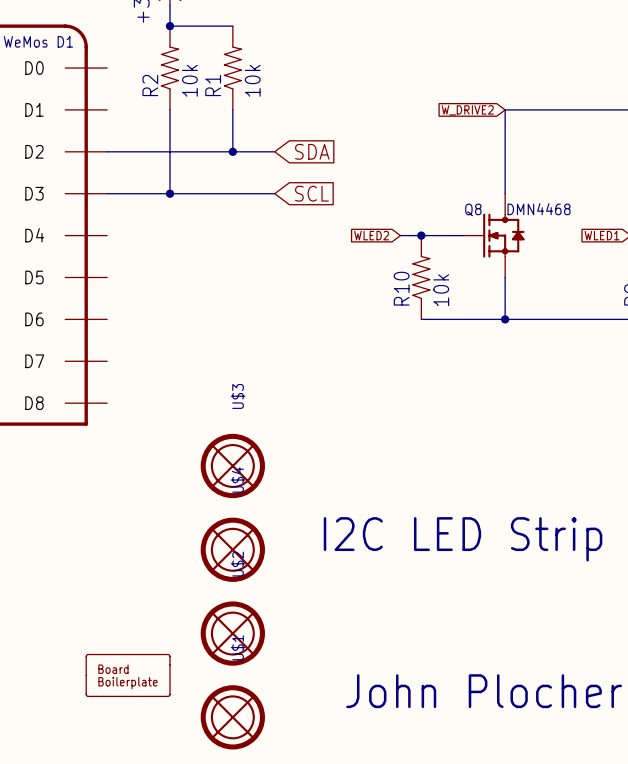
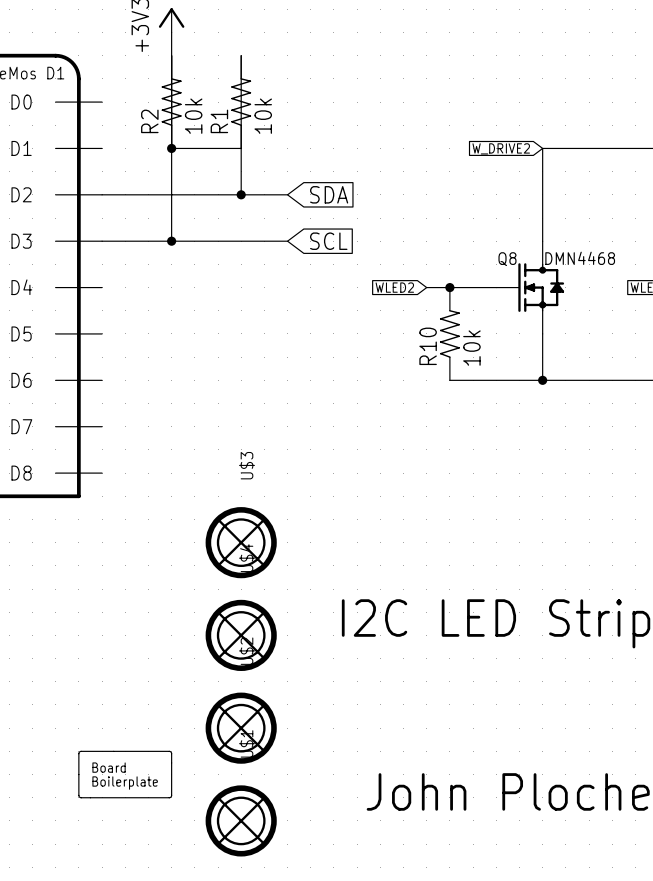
wire: (170, 26) (232, 26) -> (171, 55) (171, 148) (241, 148) (241, 55)
junction: (170, 26) -> none
junction: none -> (171, 148)

